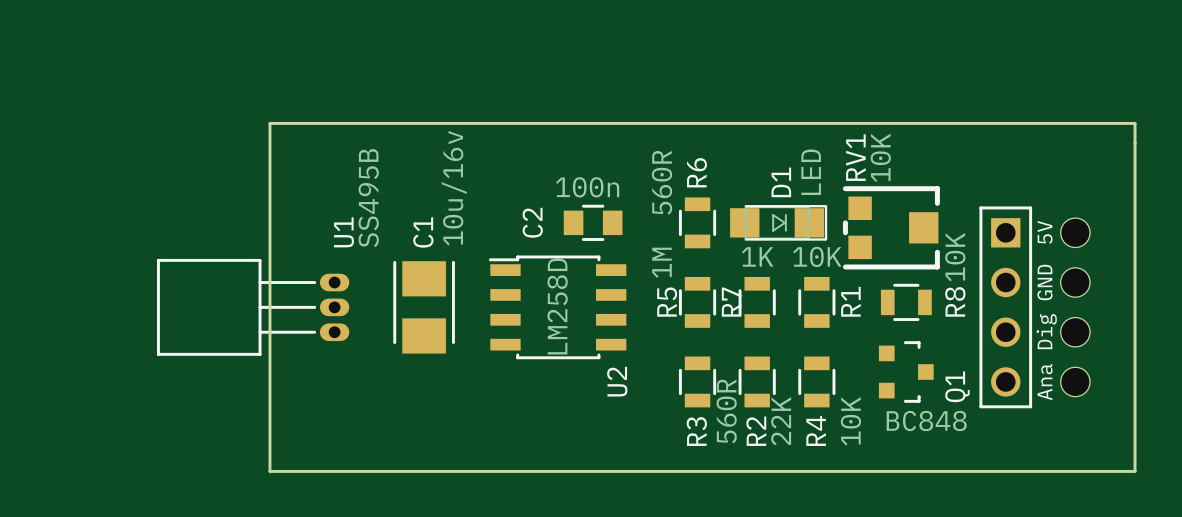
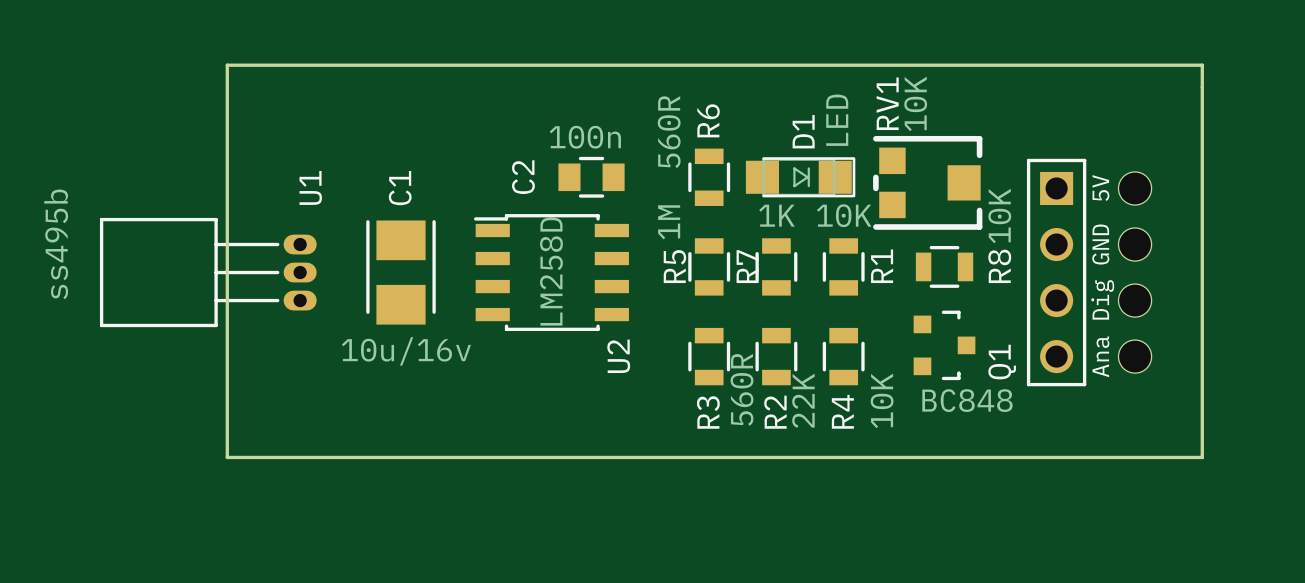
C1 value rotation: 0° (454, 188) -> 90° clockwise (406, 351)
C1 value position: 10u/16v (454, 188) -> 10u/16v (406, 351)
U1 value: SS495B (368, 198) -> ss495b (56, 244)

